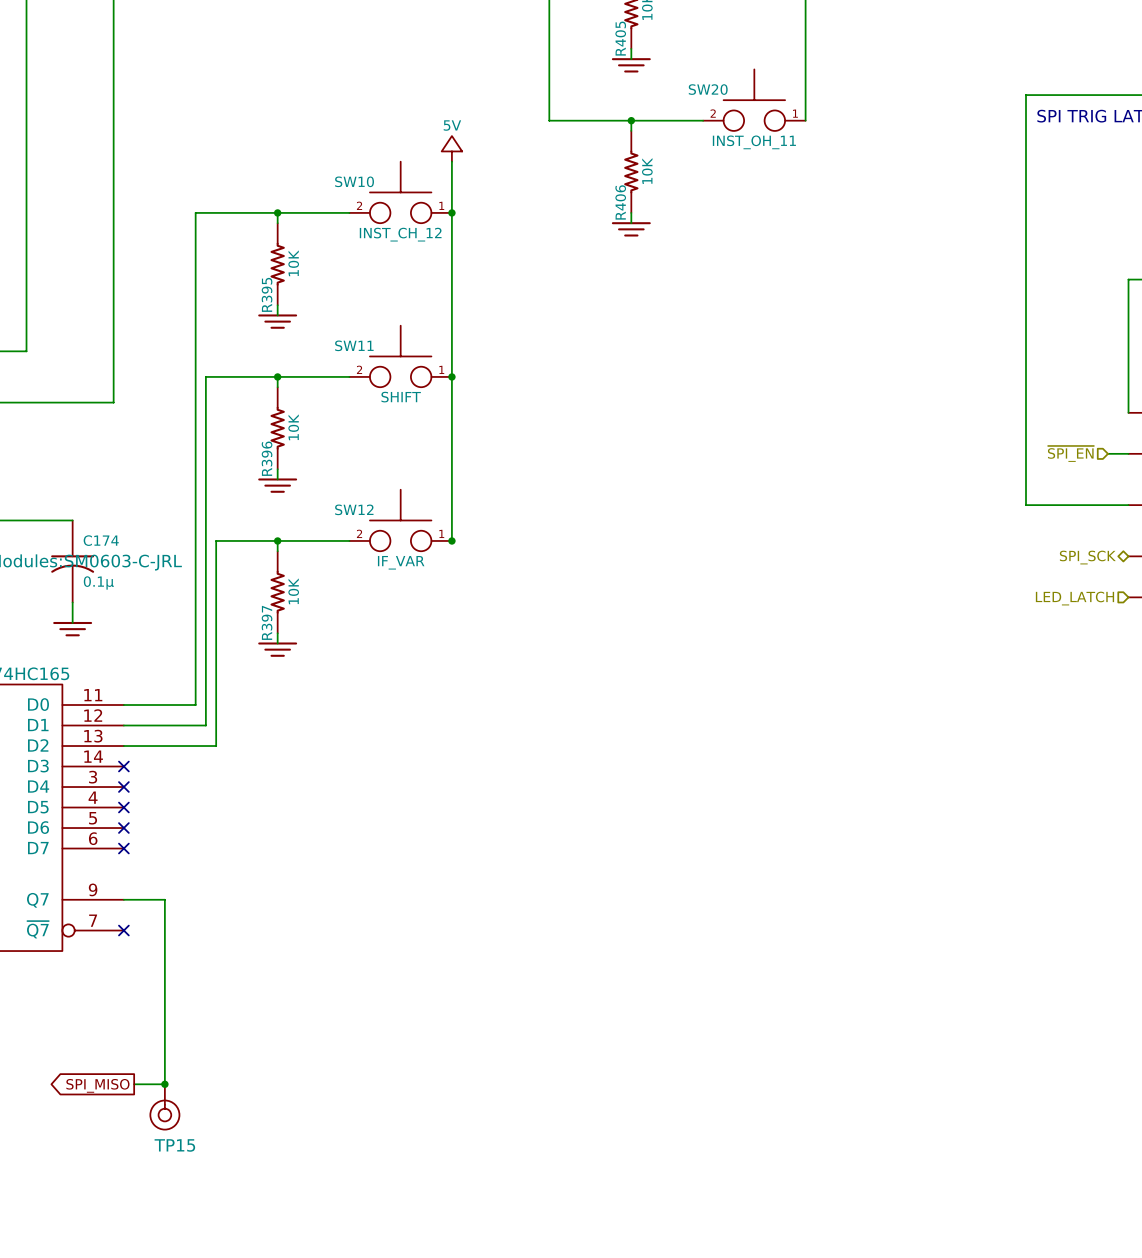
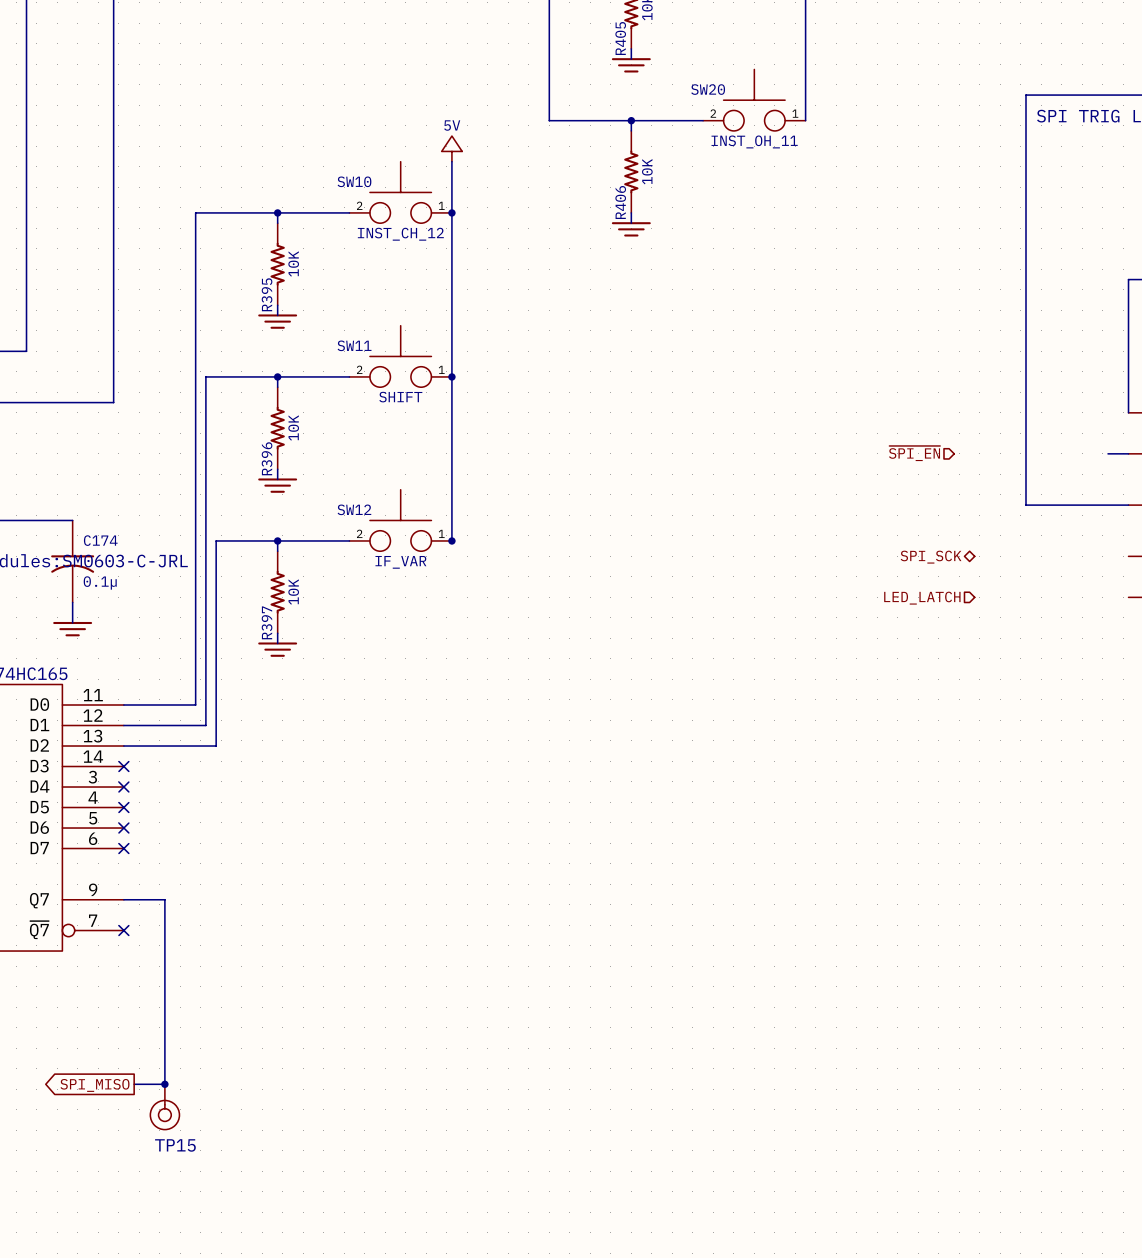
hierarchical label position: ~{SPI_EN} (1070, 453) -> ~{SPI_EN} (914, 453)
hierarchical label position: SPI_SCK (1087, 557) -> SPI_SCK (931, 557)
hierarchical label position: LED_LATCH (1074, 598) -> LED_LATCH (922, 598)

